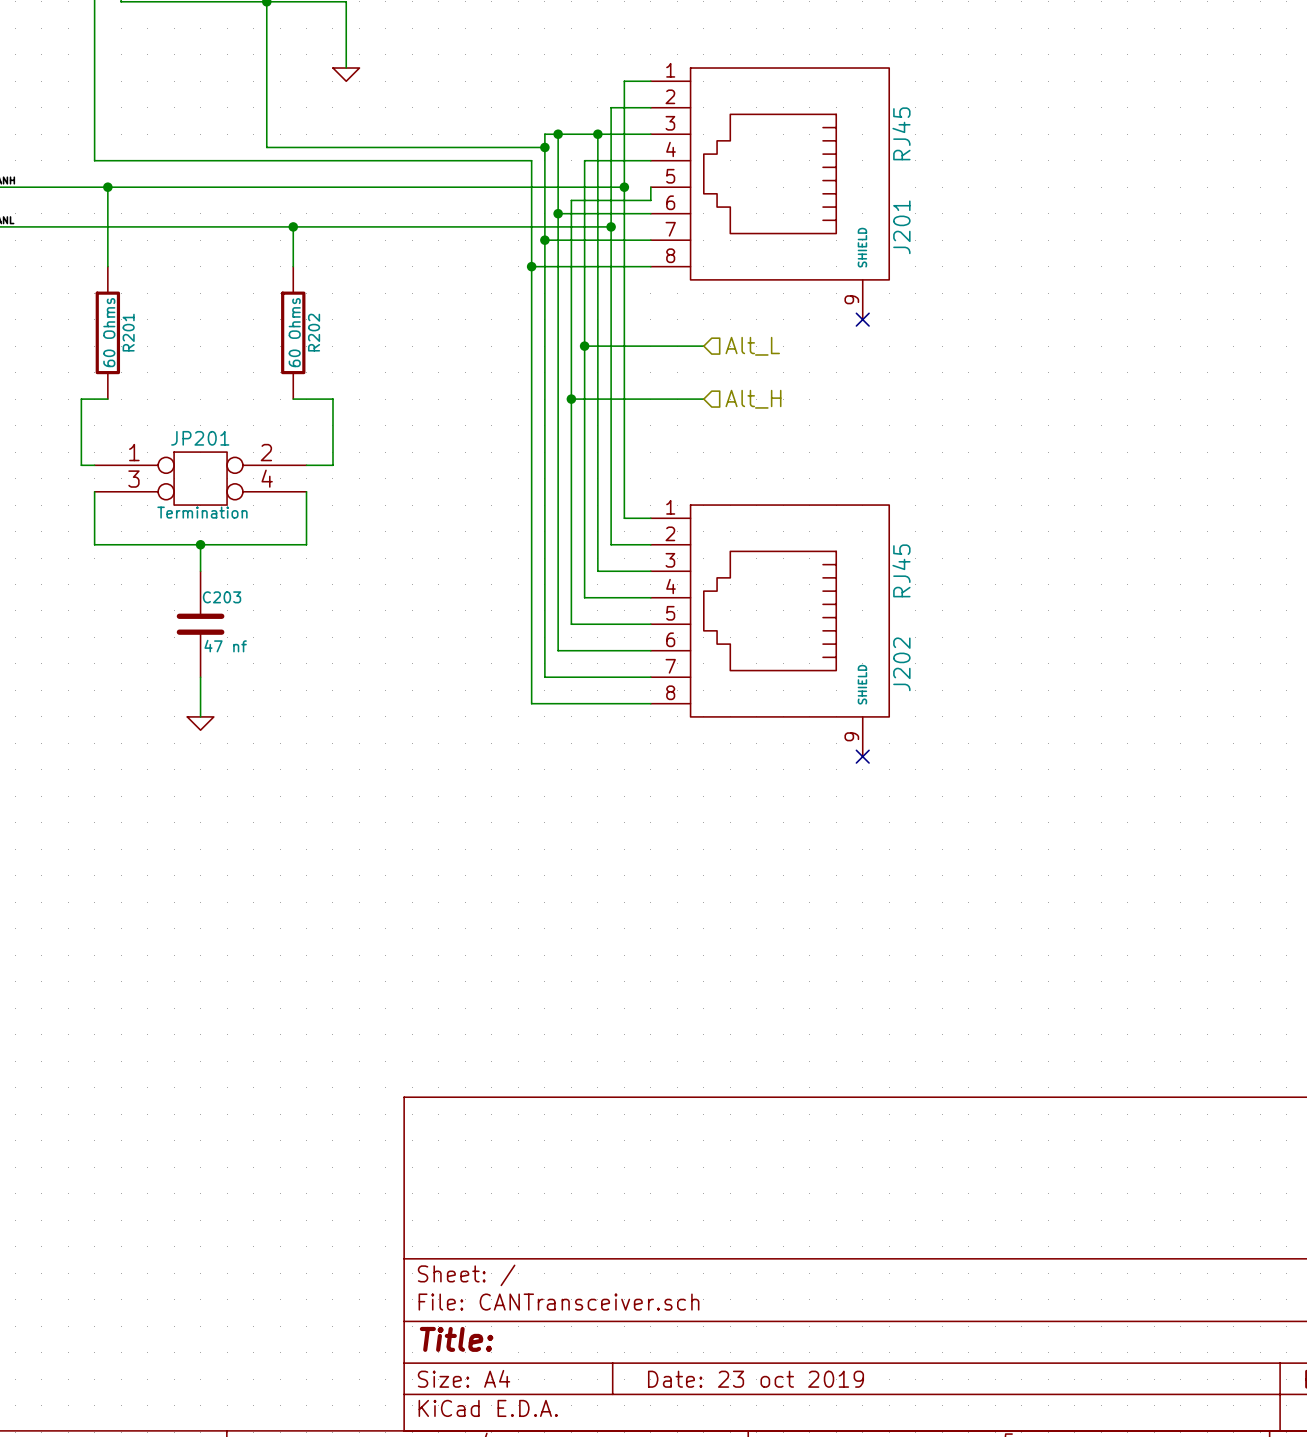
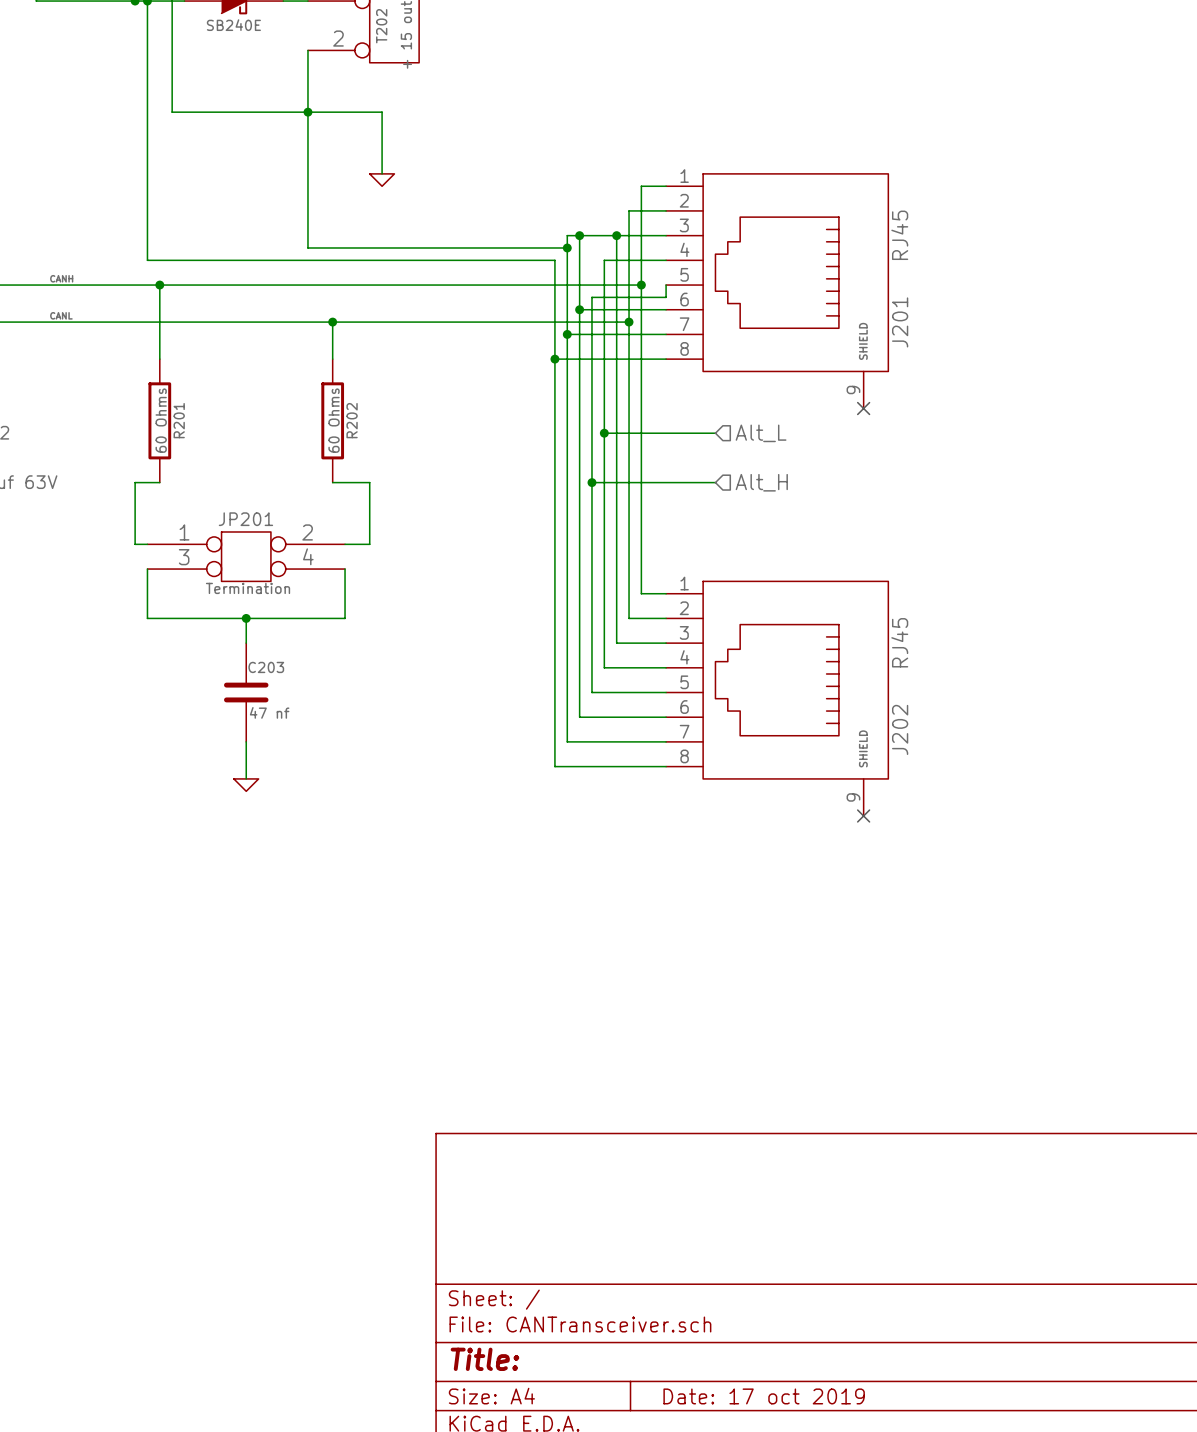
title block: Date: 23 oct 2019 (756, 1379) -> Date: 17 oct 2019 (764, 1396)

